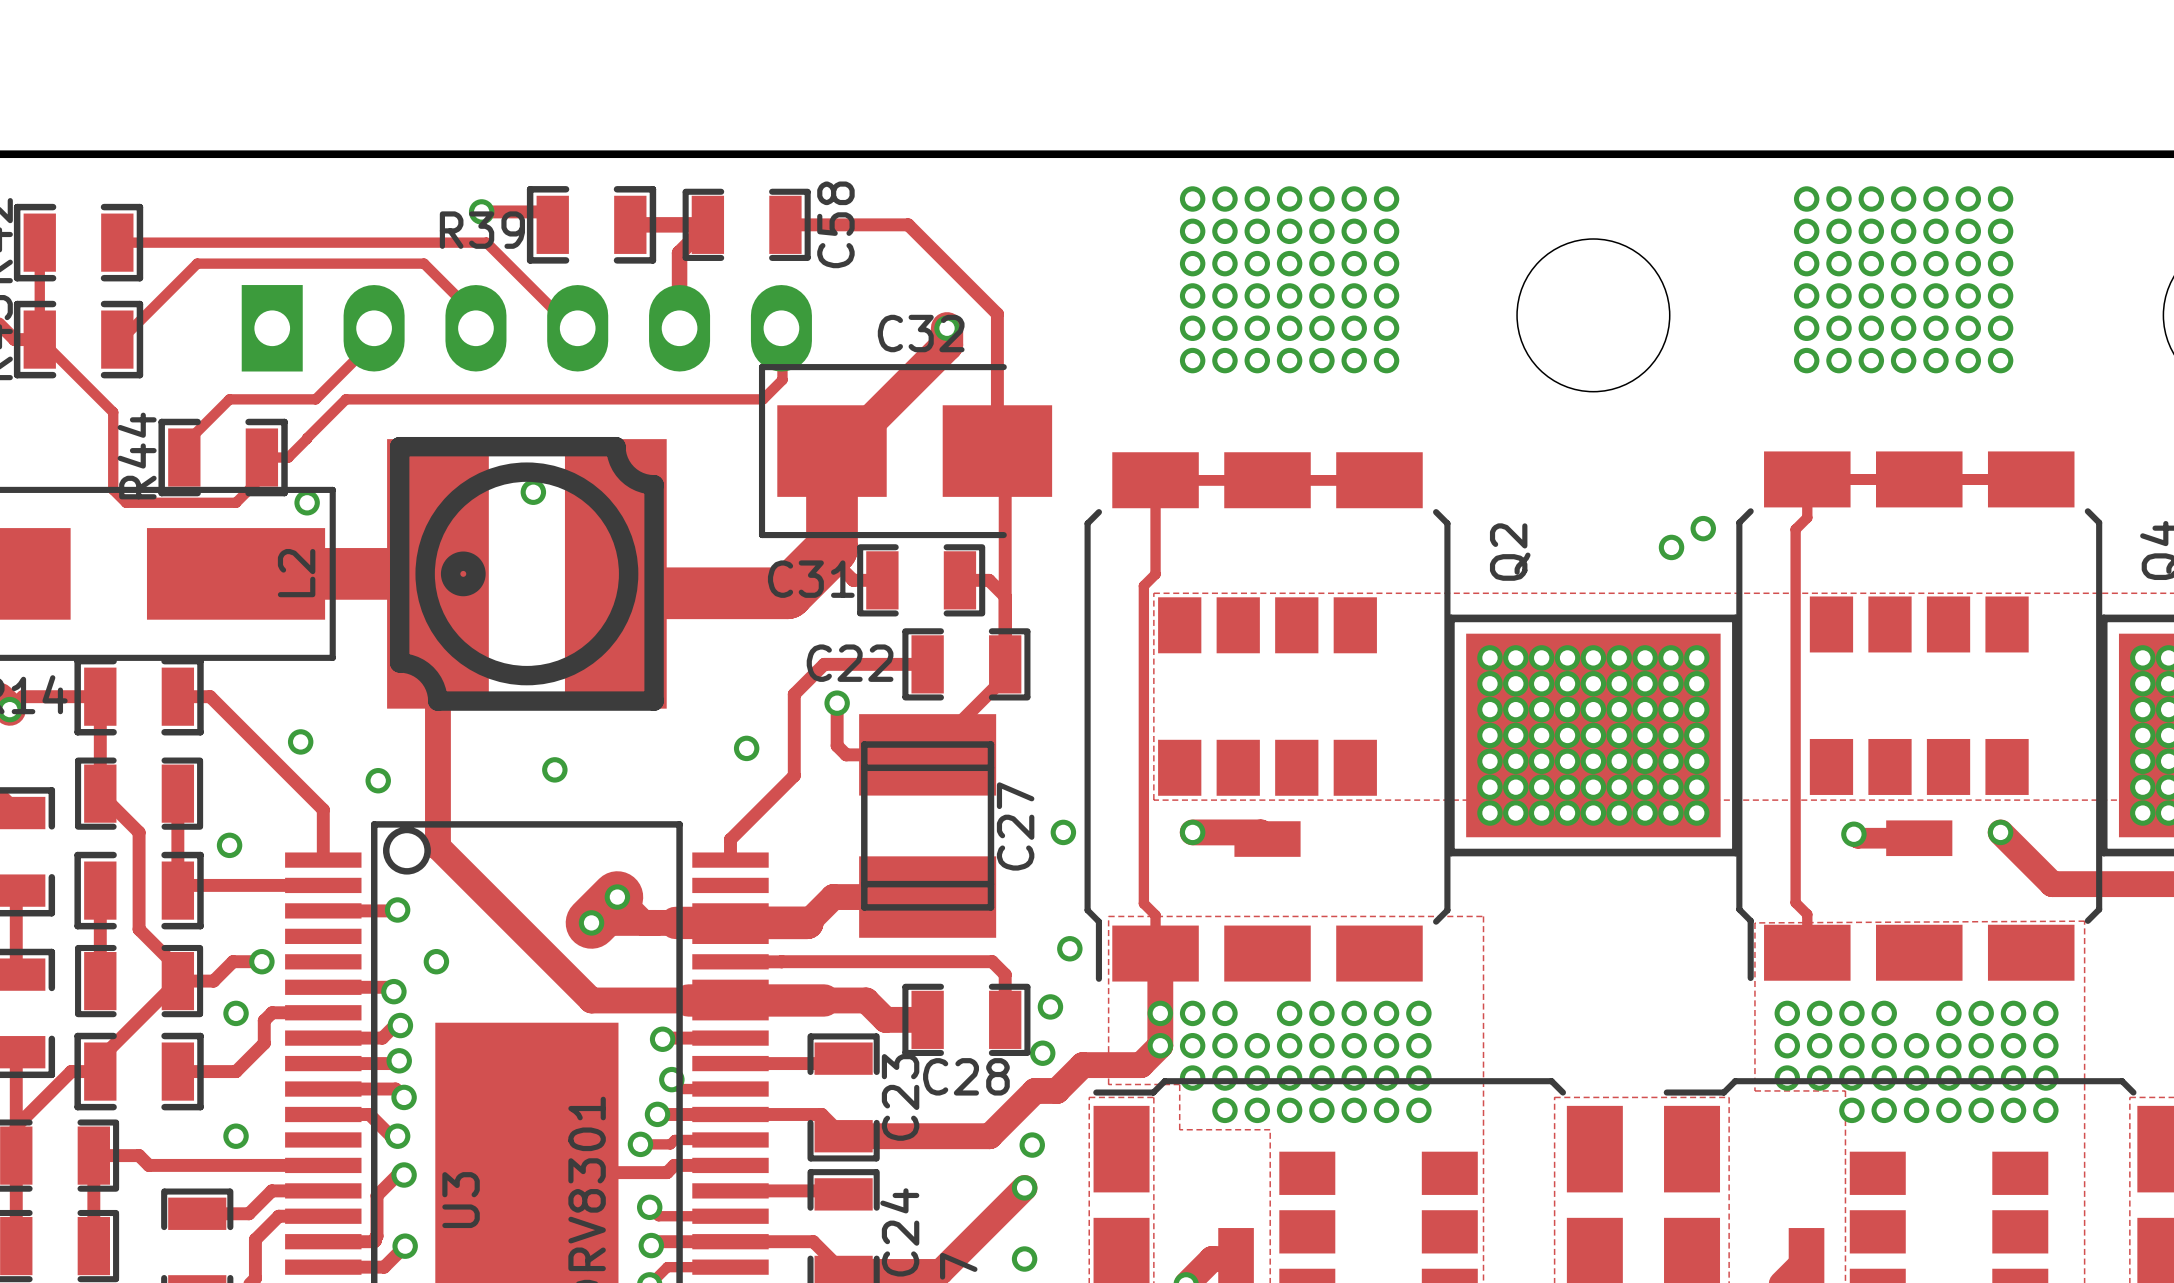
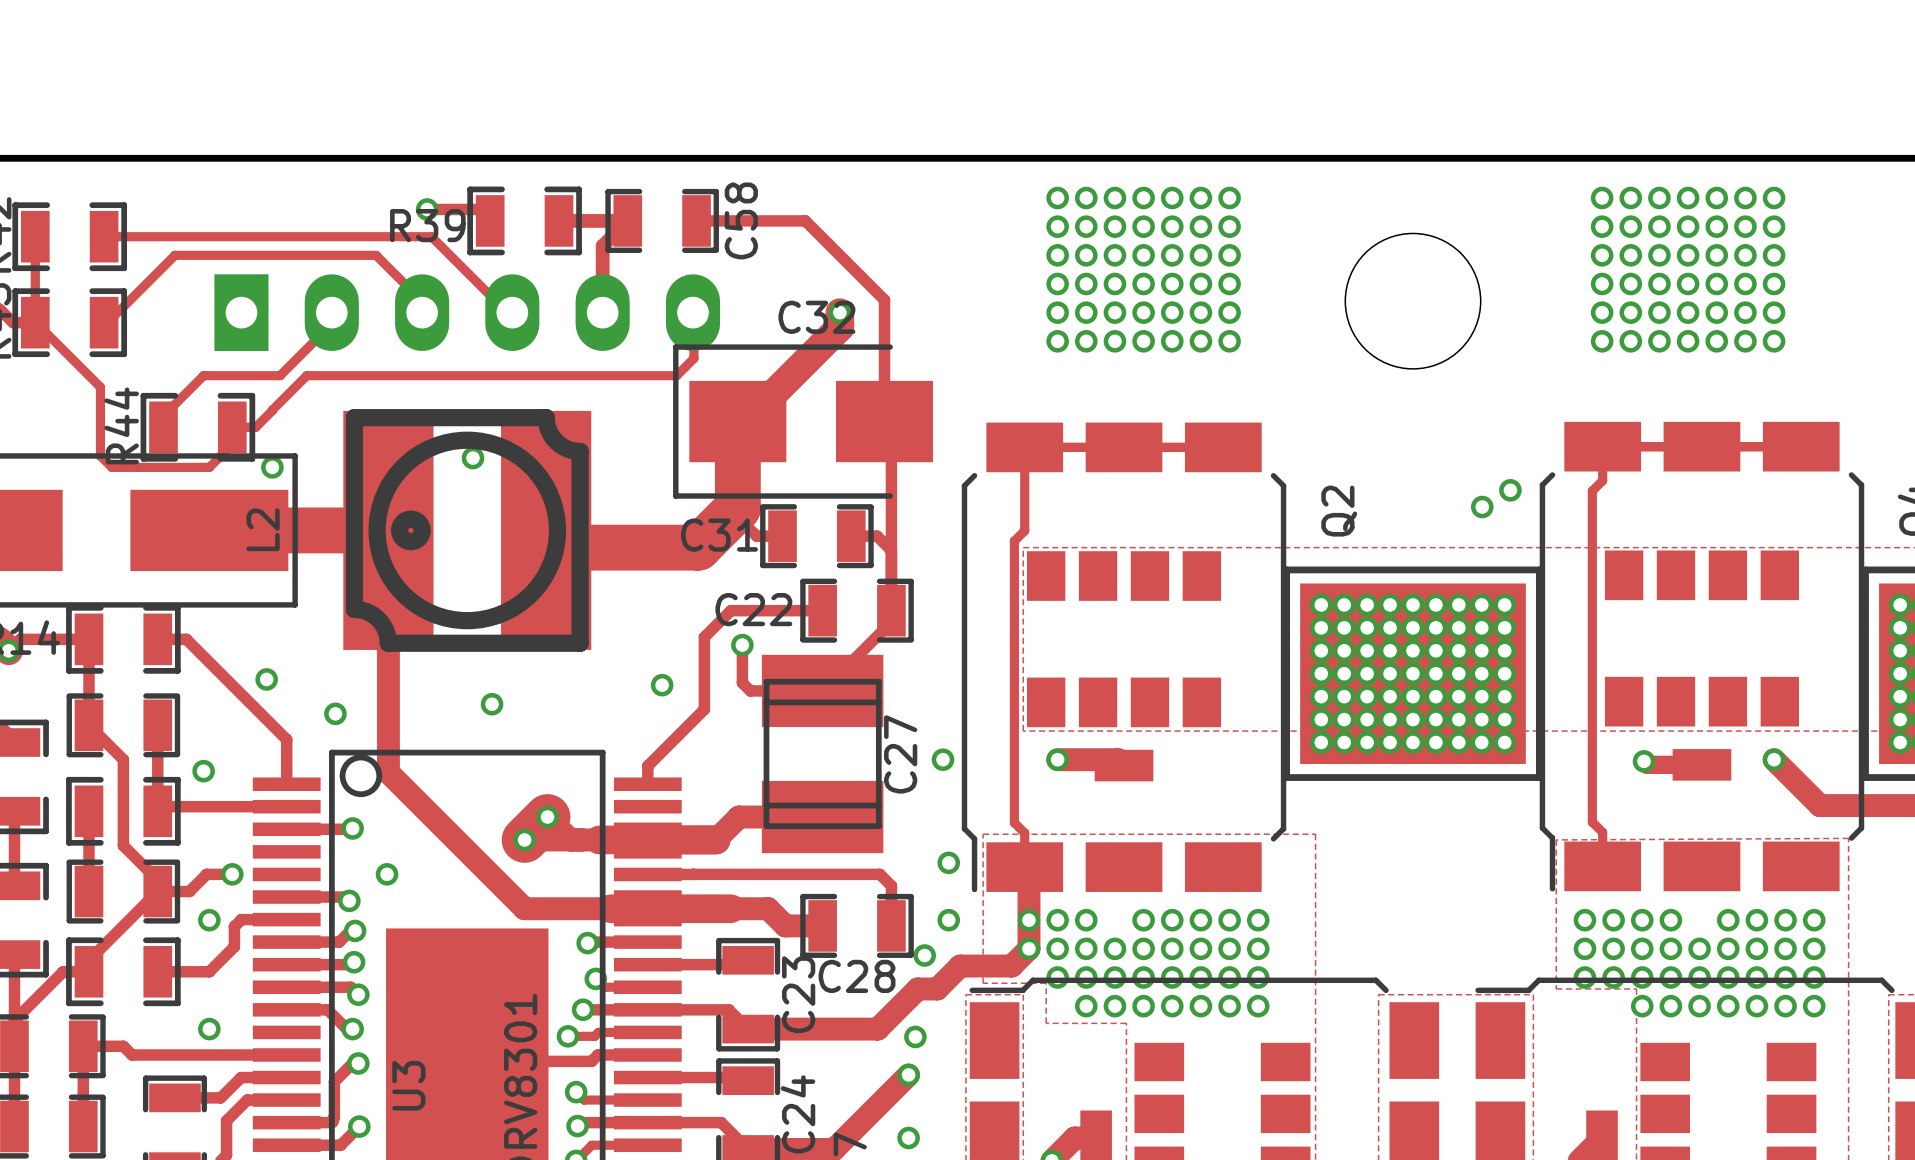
via position: (1050, 1006) -> (948, 920)

